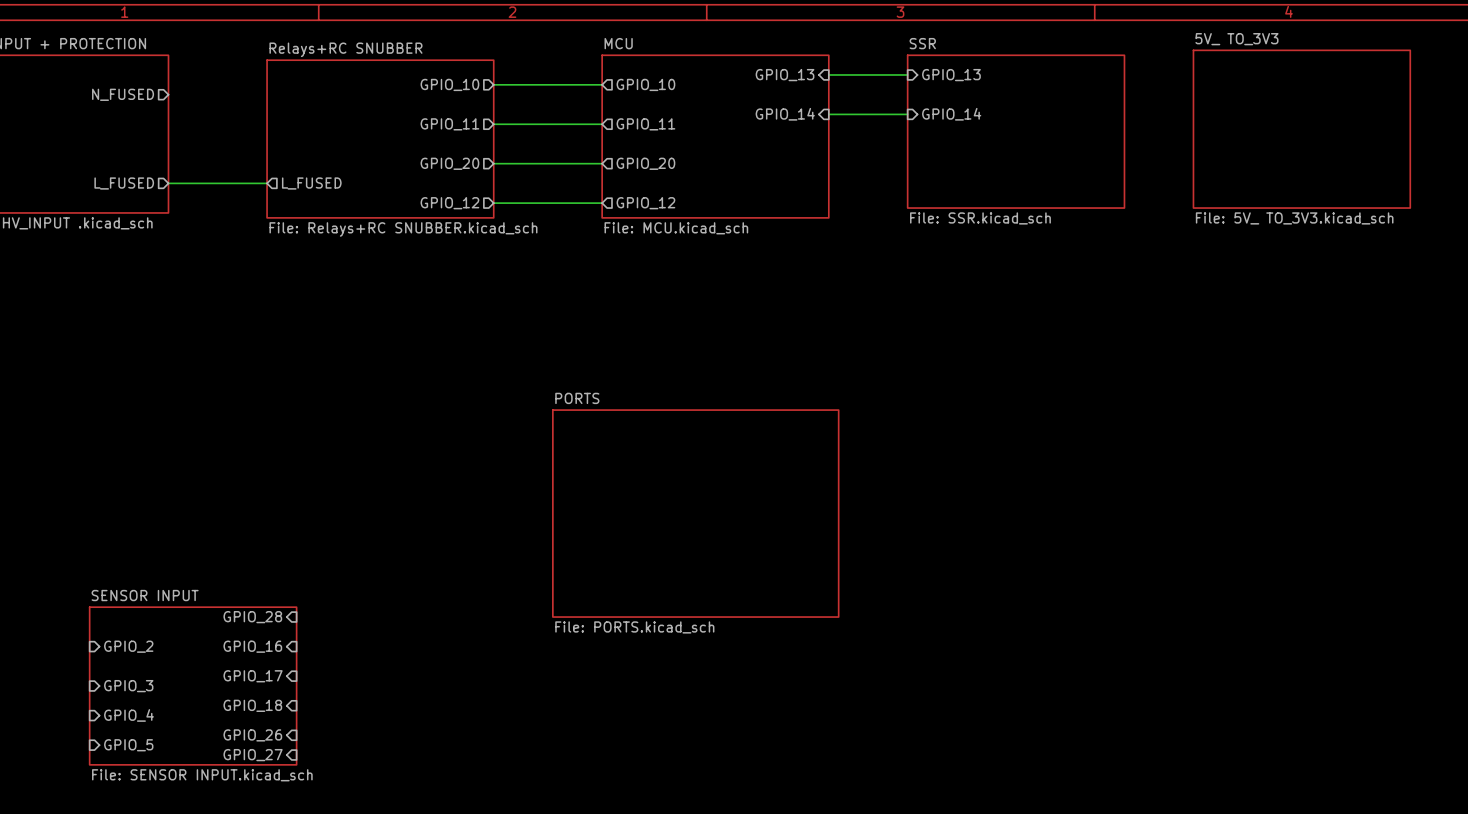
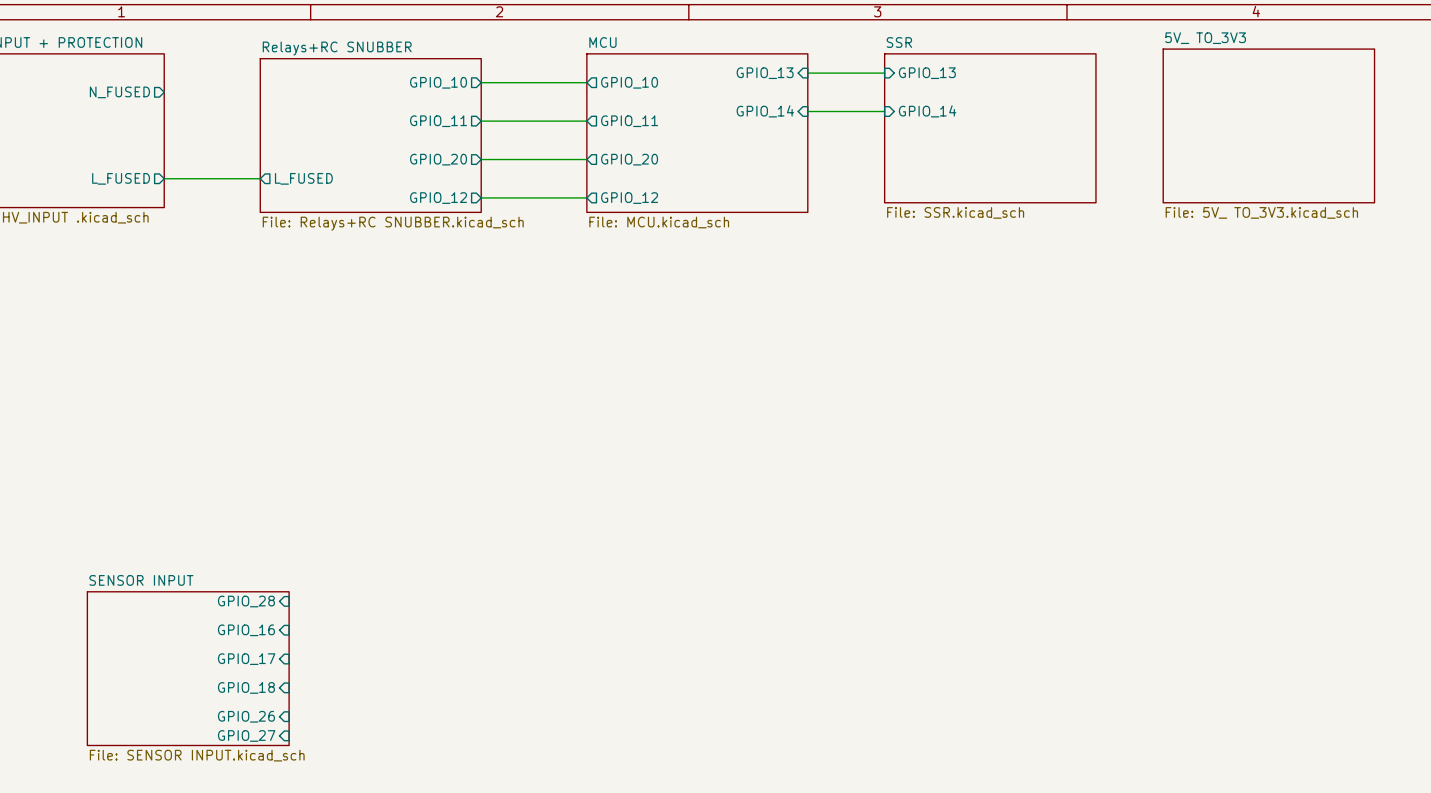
sheet PORTS: File: PORTS.kicad_sch (695, 513) -> none
sheet pin: GPIO_2 (128, 646) -> none
sheet pin: GPIO_3 (128, 686) -> none
sheet pin: GPIO_4 (128, 715) -> none
sheet pin: GPIO_5 (128, 745) -> none

